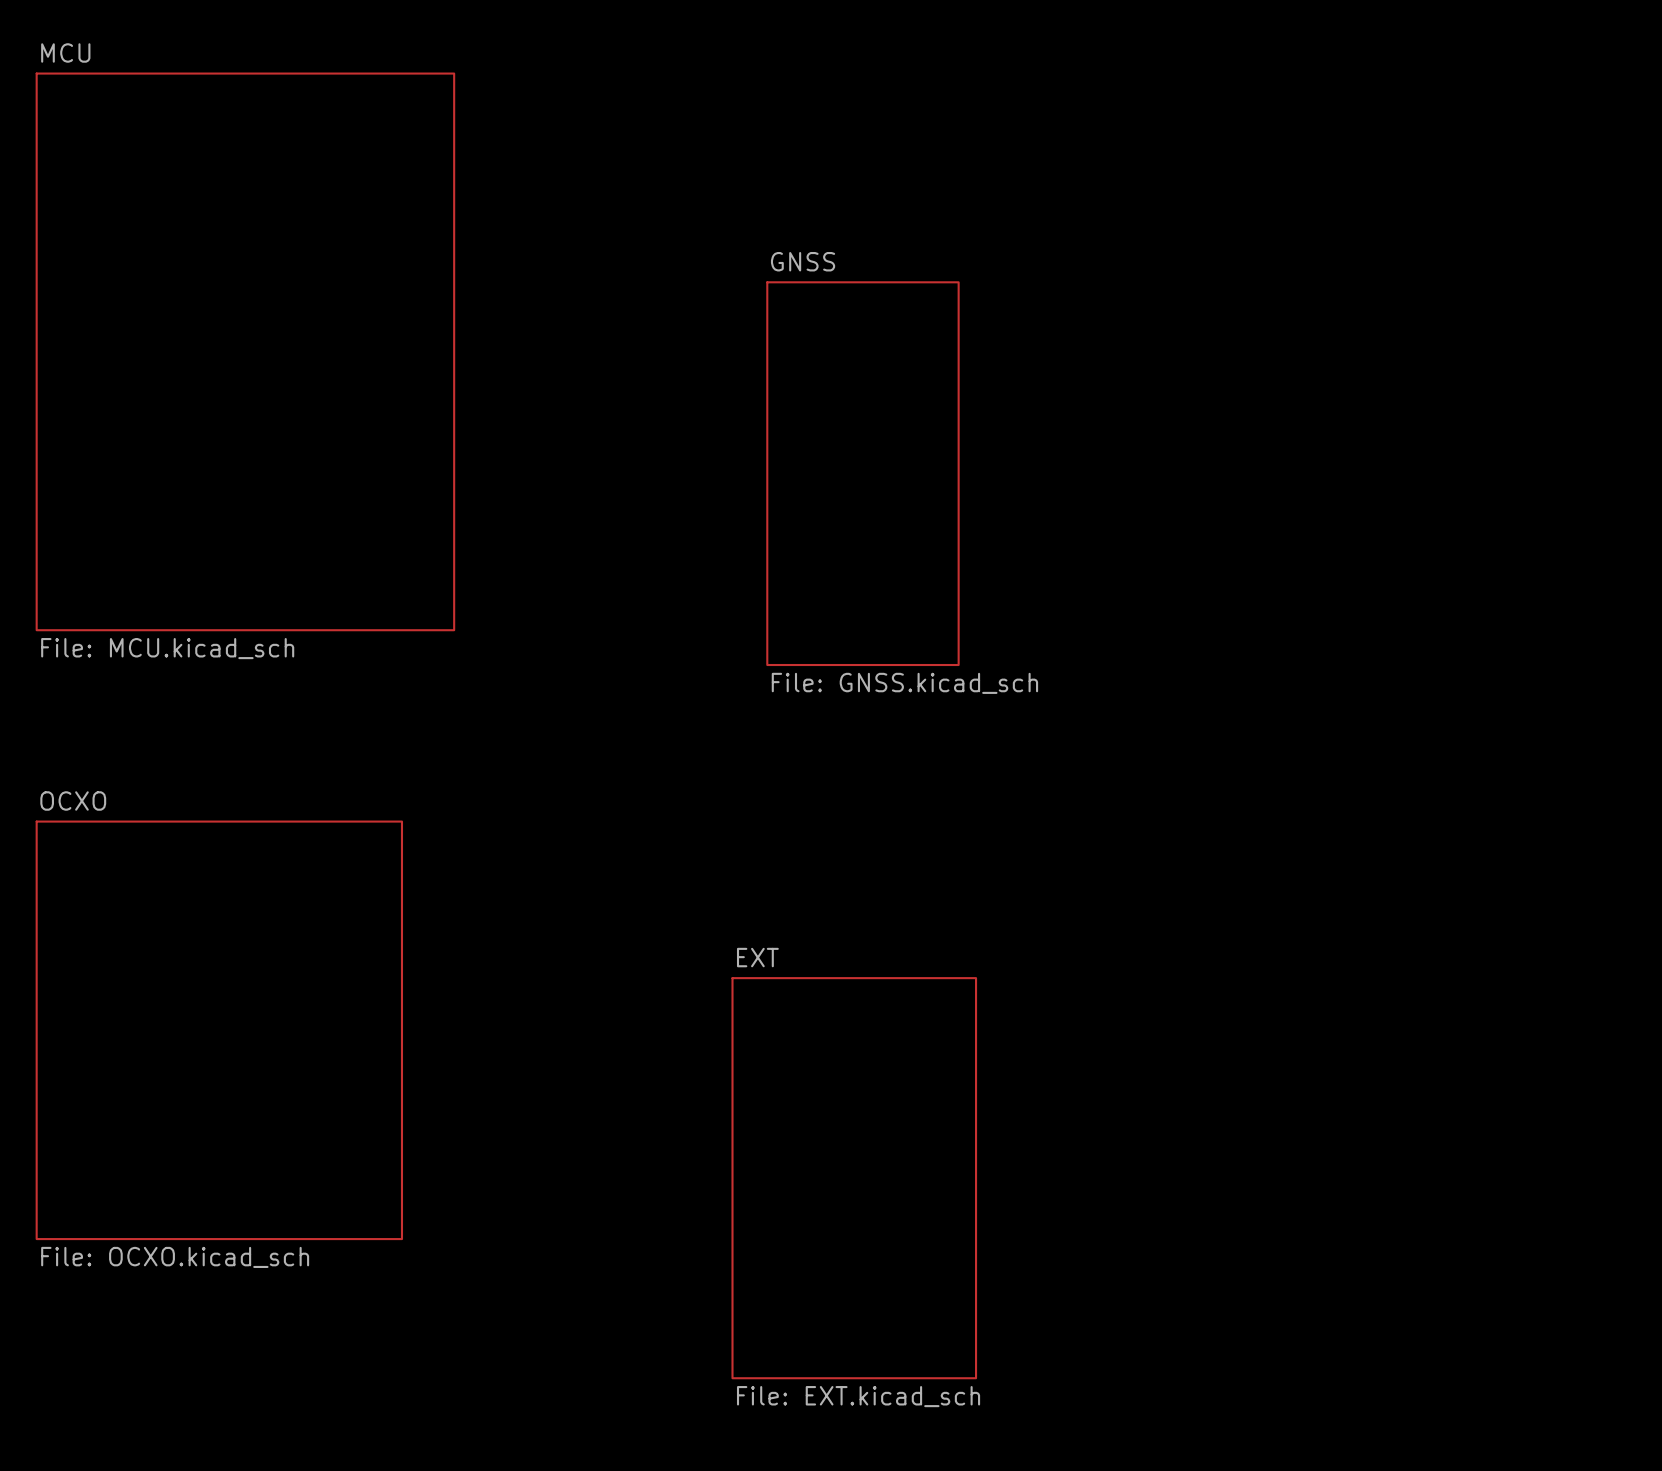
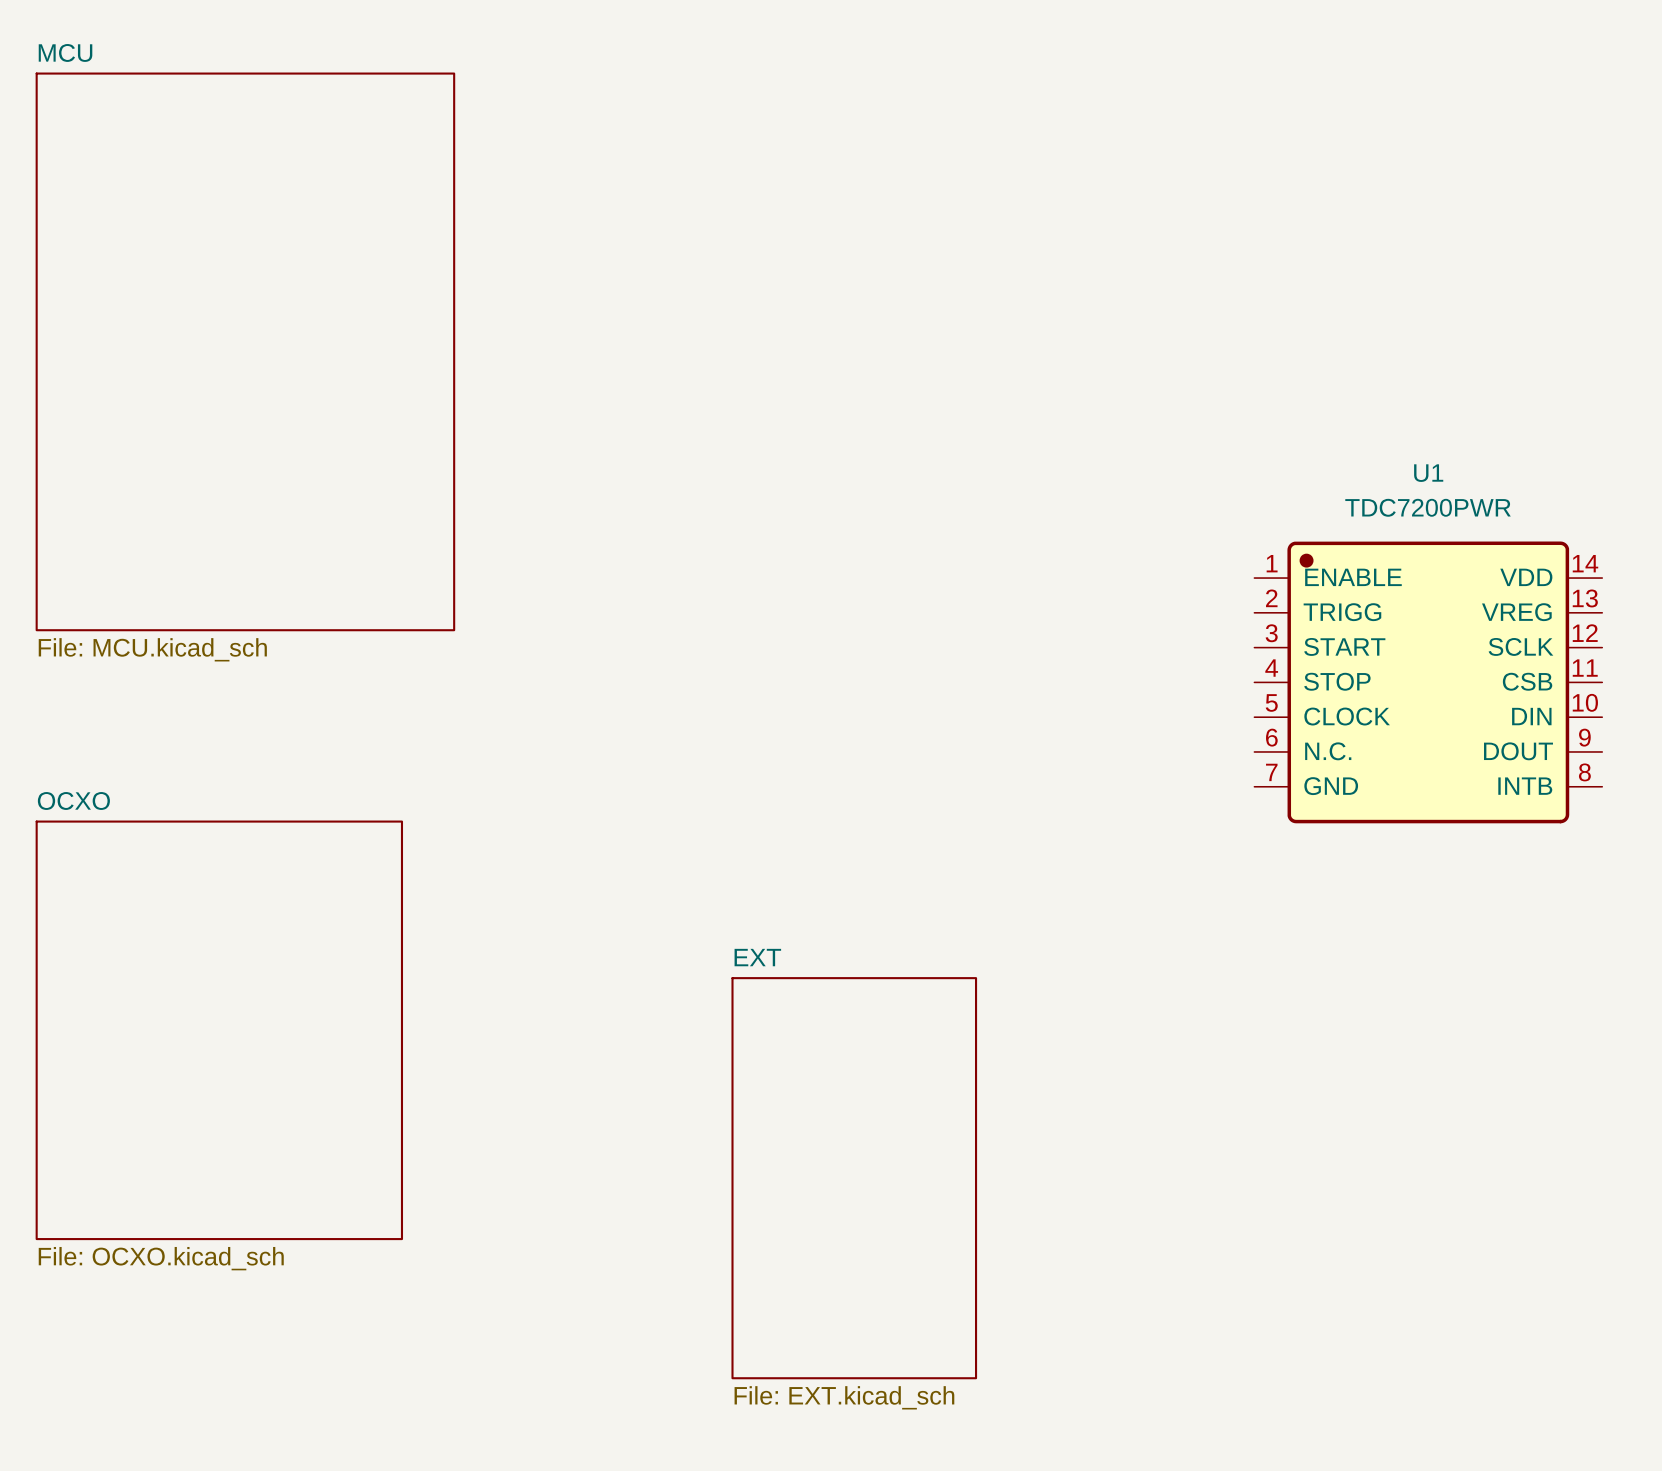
sheet GNSS: File: GNSS.kicad_sch (862, 473) -> none
U1: none -> TDC7200PWR (1428, 682)

